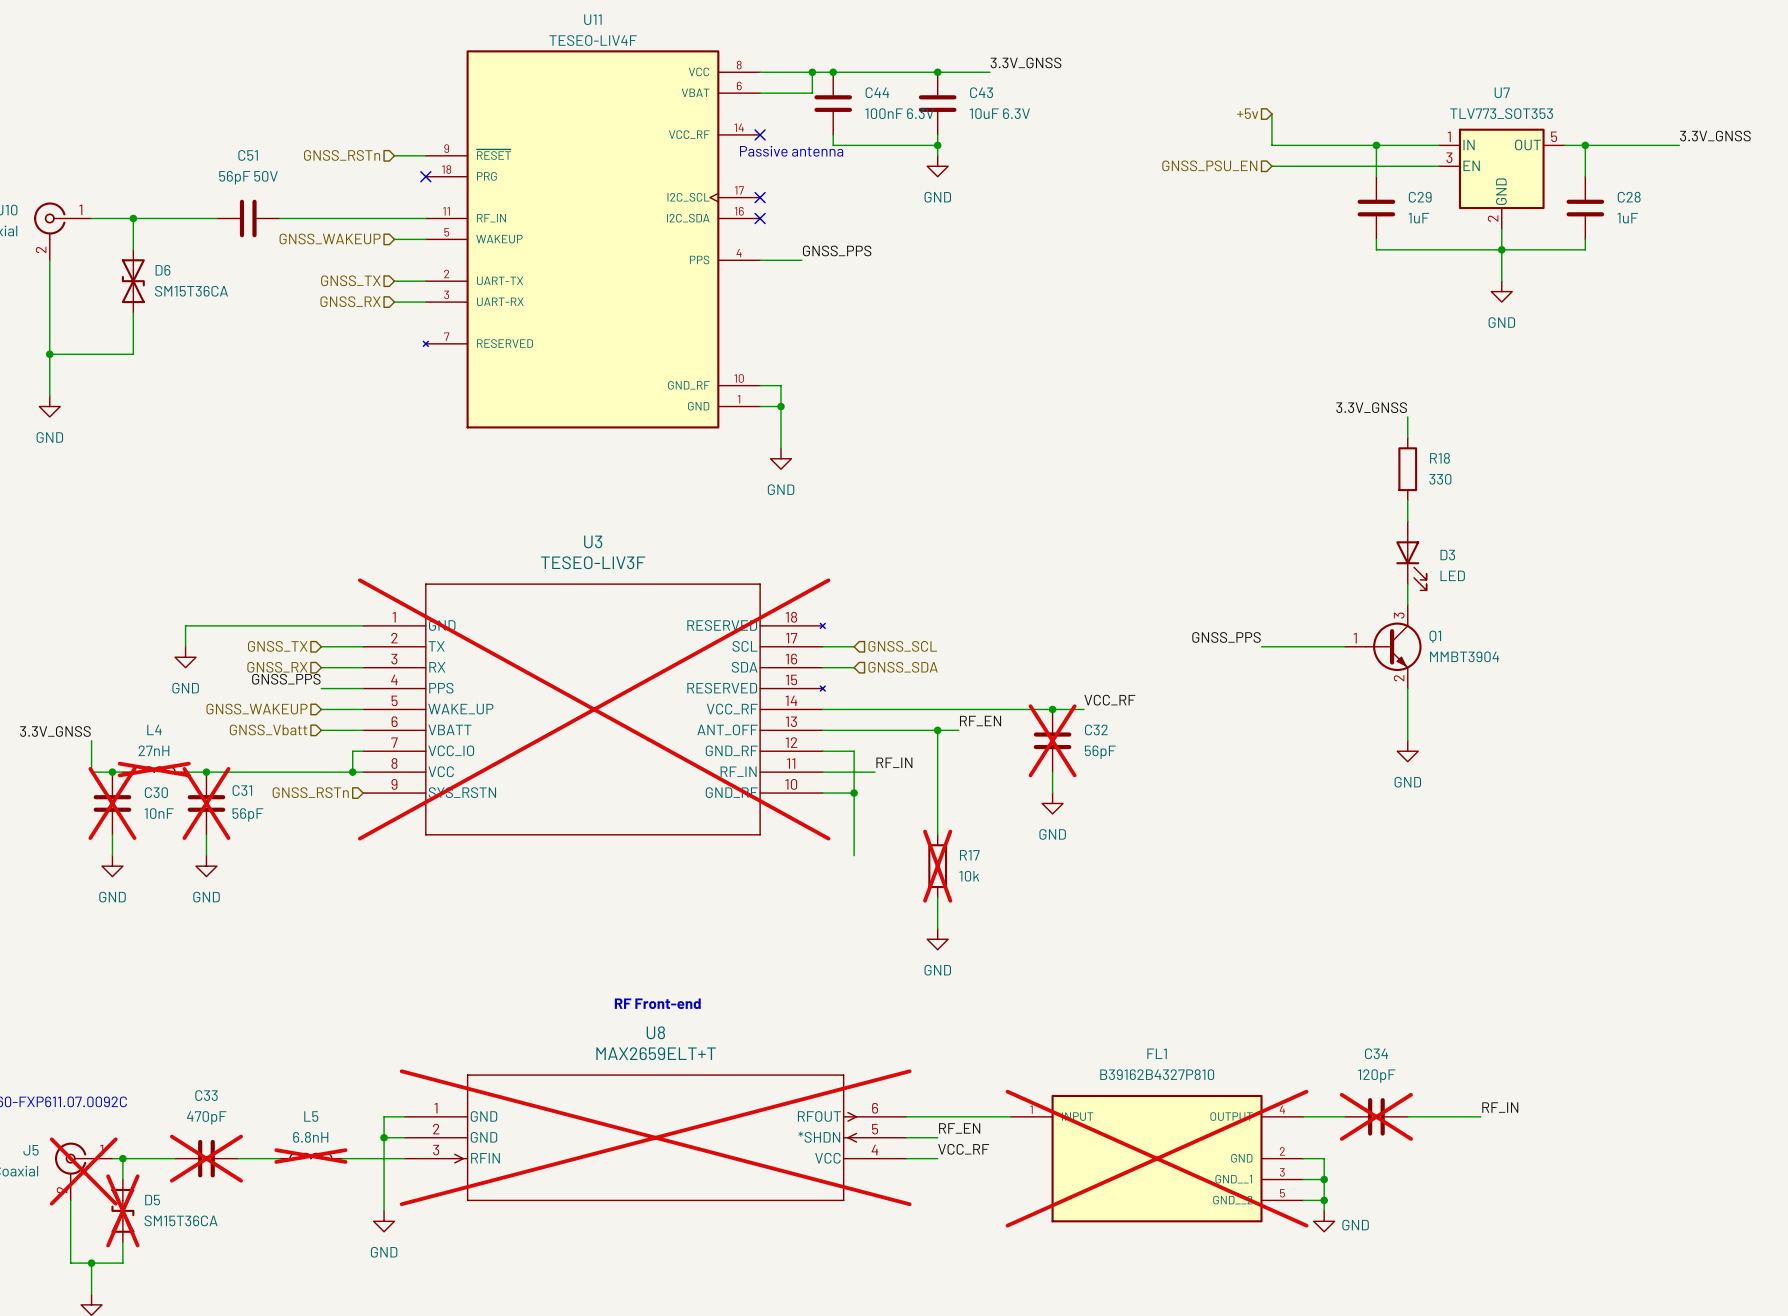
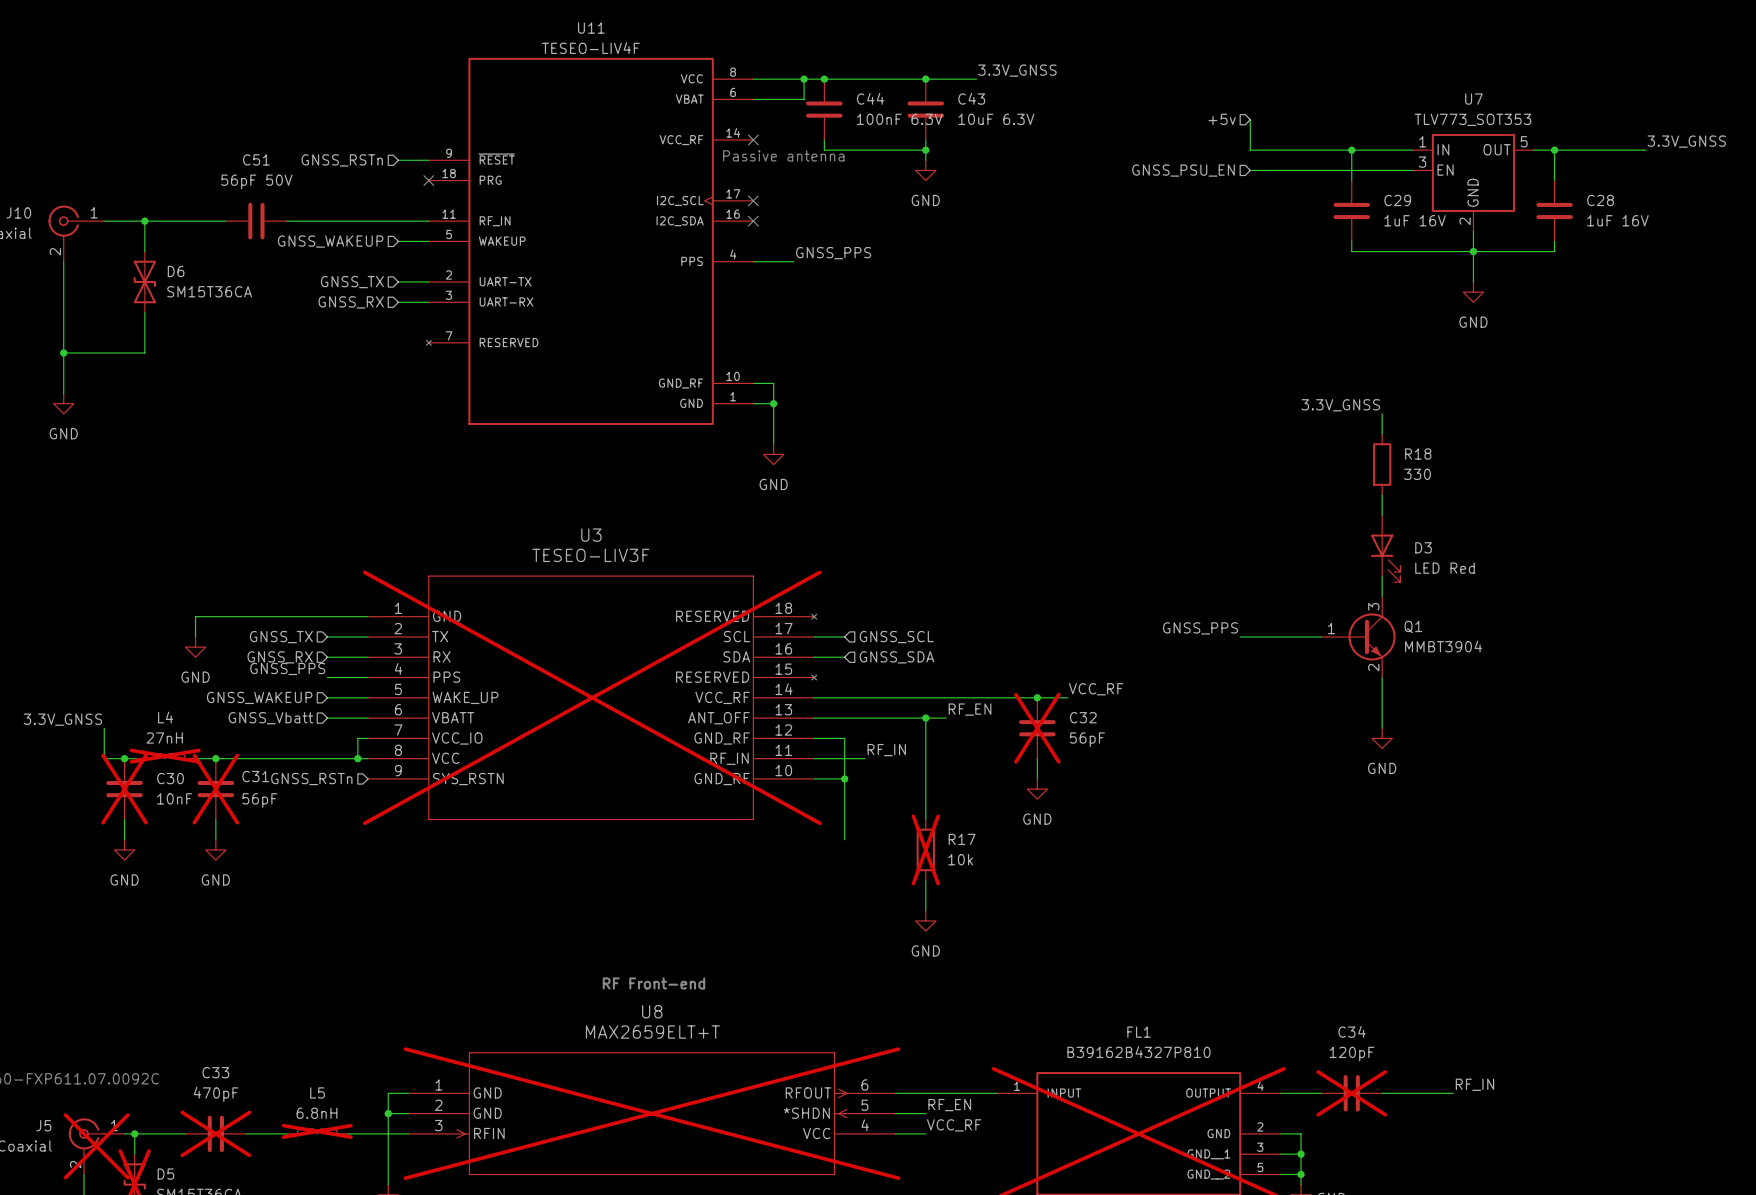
C29 value: 1uF (1418, 218) -> 1uF 16V (1415, 220)
C28 value: 1uF (1627, 218) -> 1uF 16V (1617, 220)
D3 value: LED (1452, 575) -> LED Red (1445, 568)

